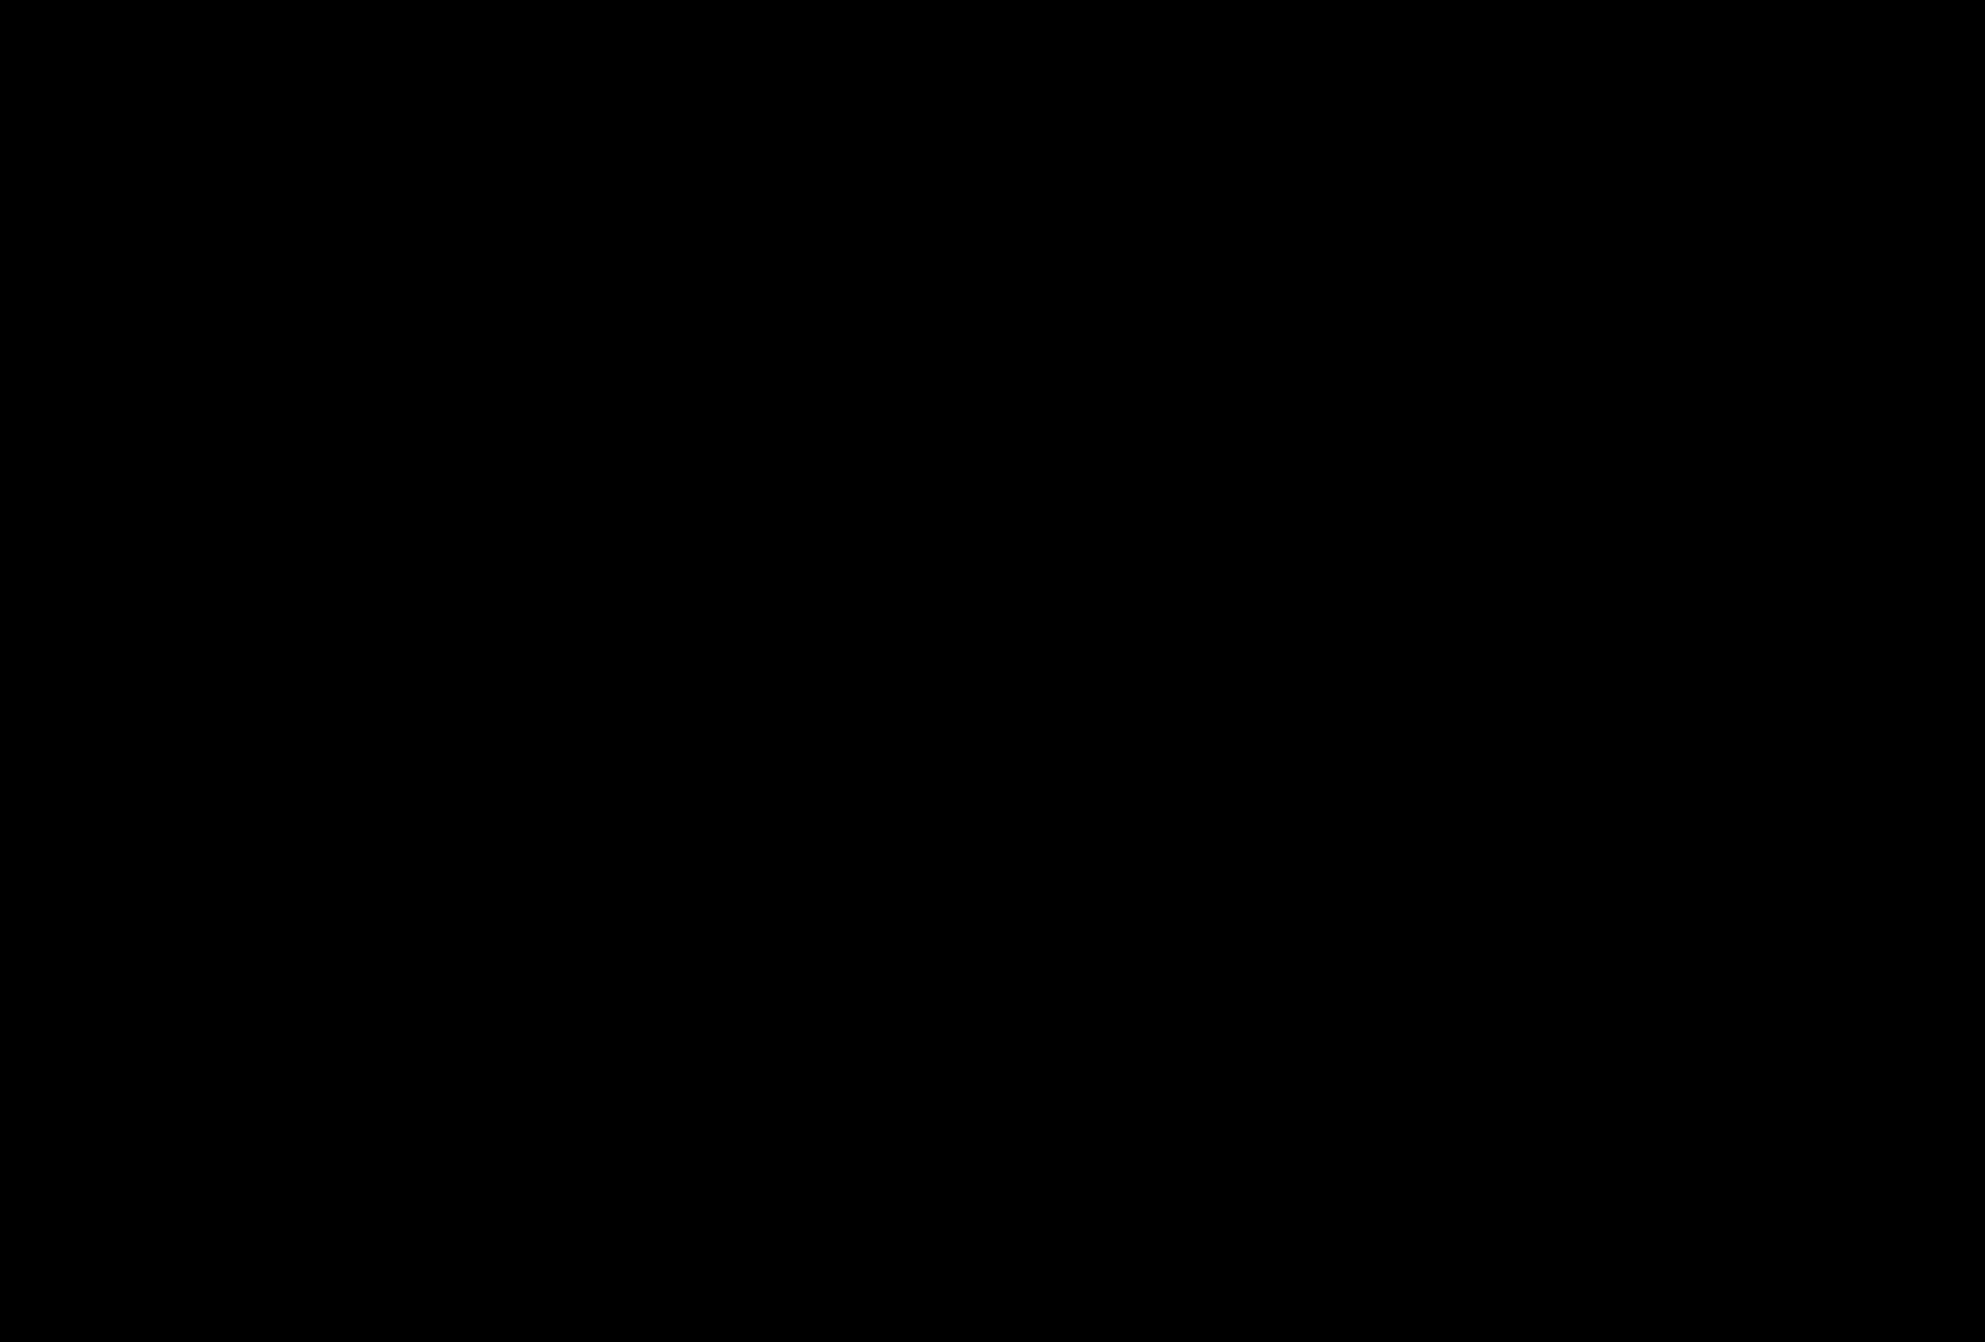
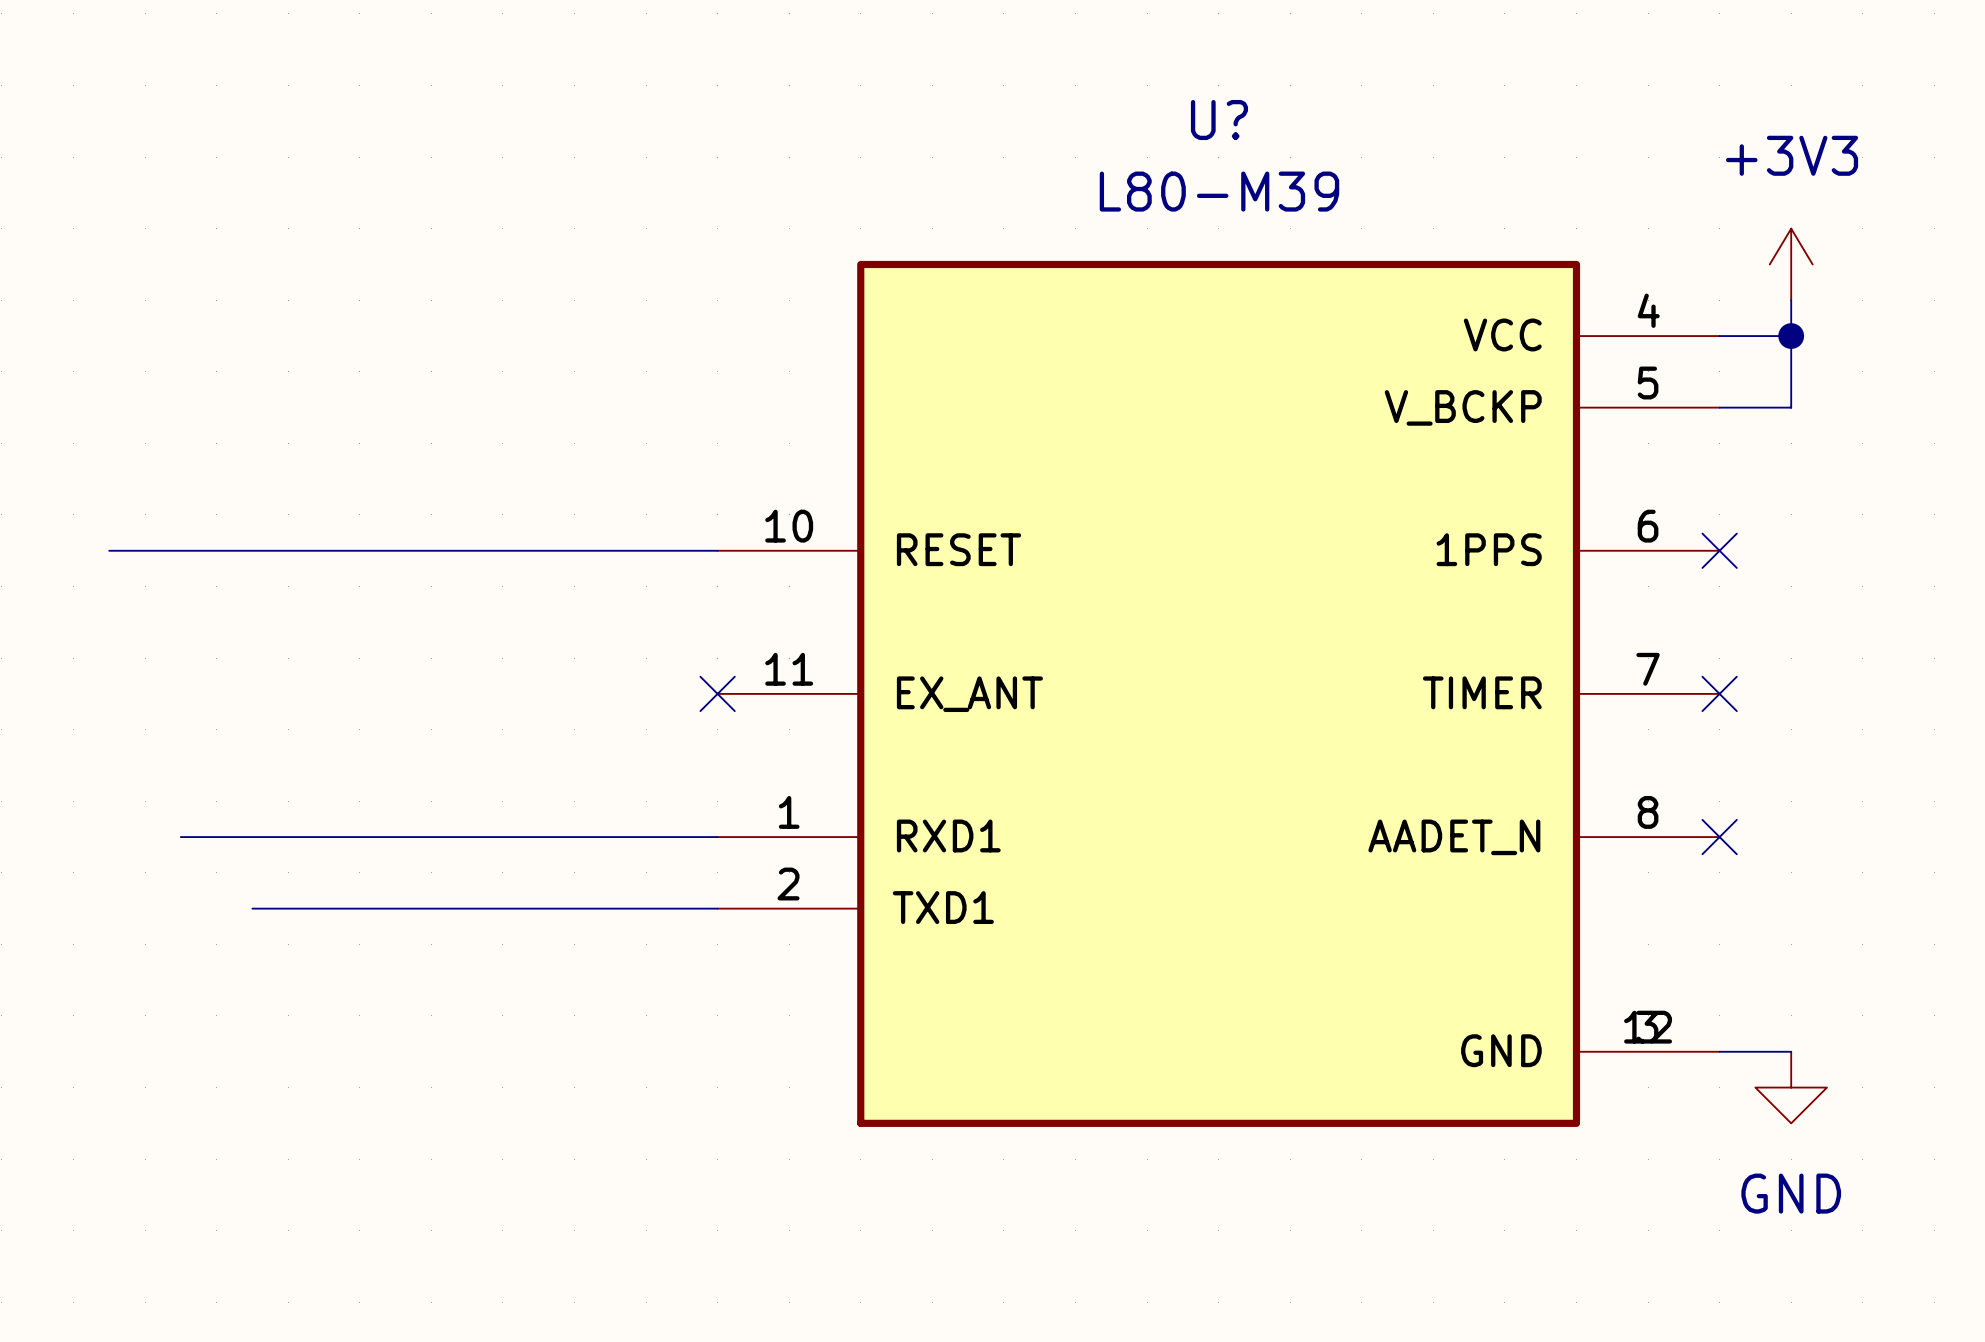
power symbol: none -> +3V3 (1791, 264)
wire: none -> (1791, 300) (1791, 407) (1719, 407)
wire: none -> (1719, 336) (1791, 336)
junction: none -> (1791, 336)
wire: none -> (109, 550) (717, 550)
no-connect mark: none -> (1719, 550)
no-connect mark: none -> (717, 693)
U?: none -> L80-M39 (1218, 693)
no-connect mark: none -> (1719, 693)
wire: none -> (180, 837) (717, 837)
no-connect mark: none -> (1719, 837)
wire: none -> (252, 908) (717, 908)
wire: none -> (1719, 1051) (1791, 1051)
power symbol: none -> GND (1791, 1087)

